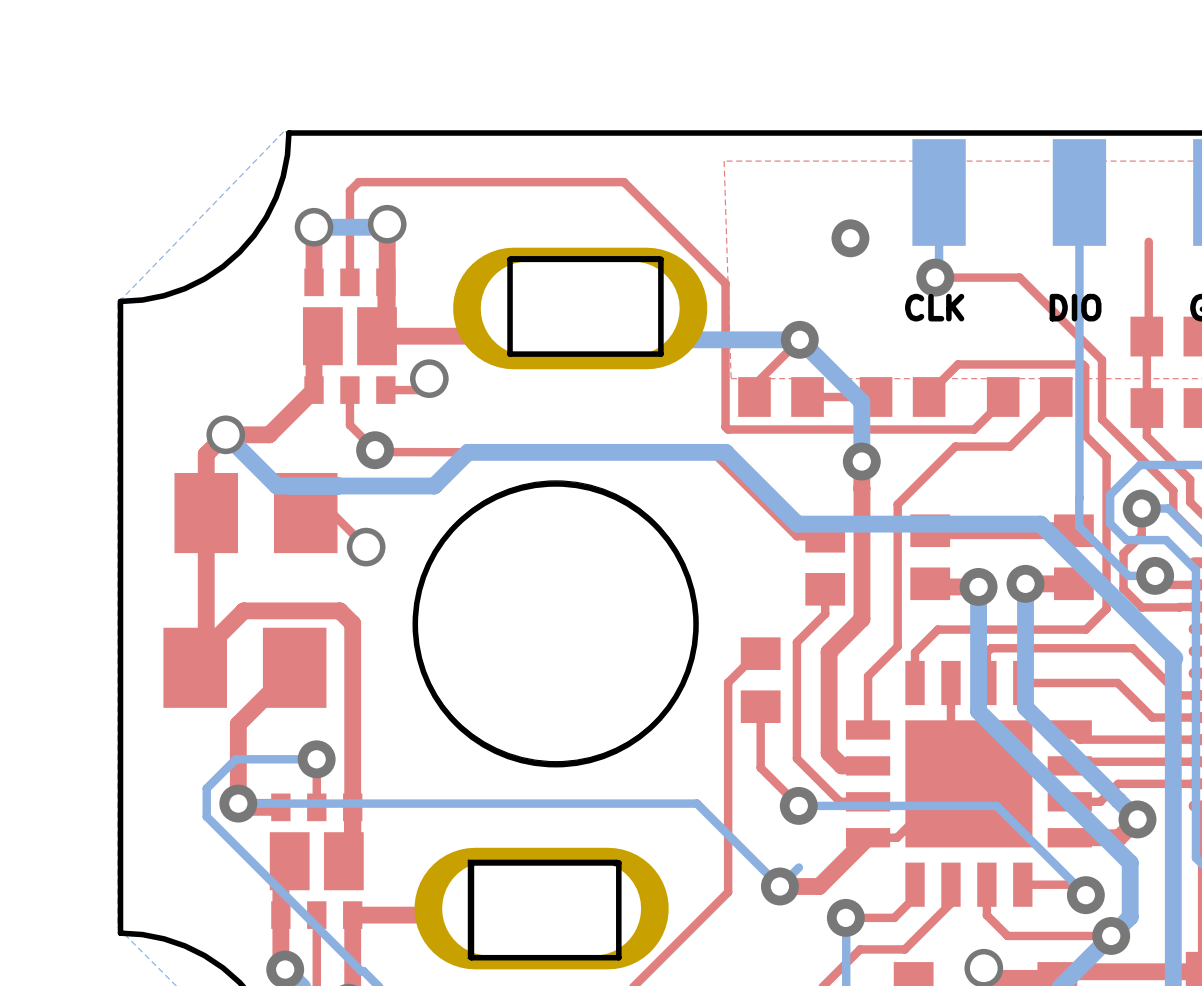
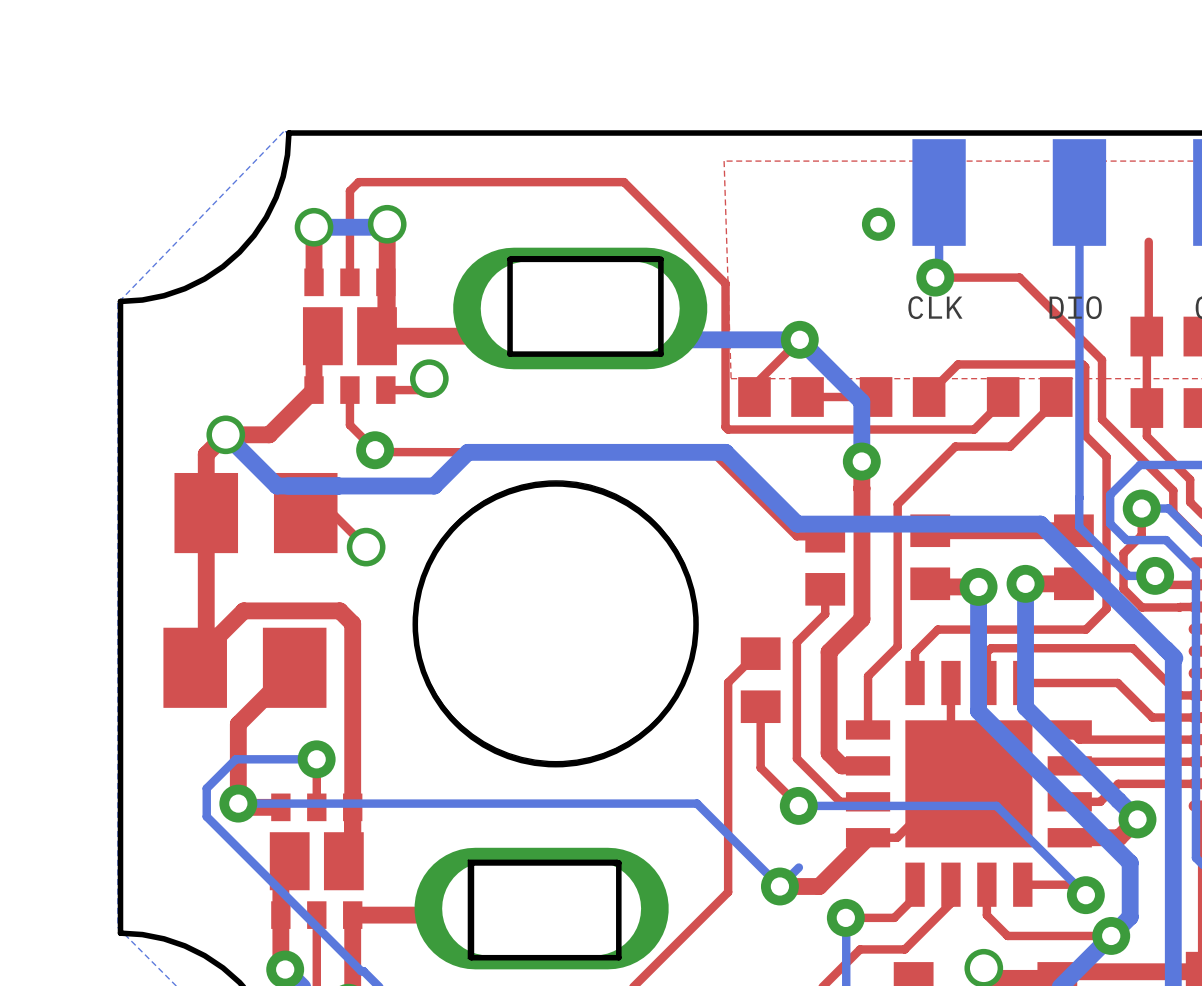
part: none -> (878, 224)
via: (850, 238) -> none

